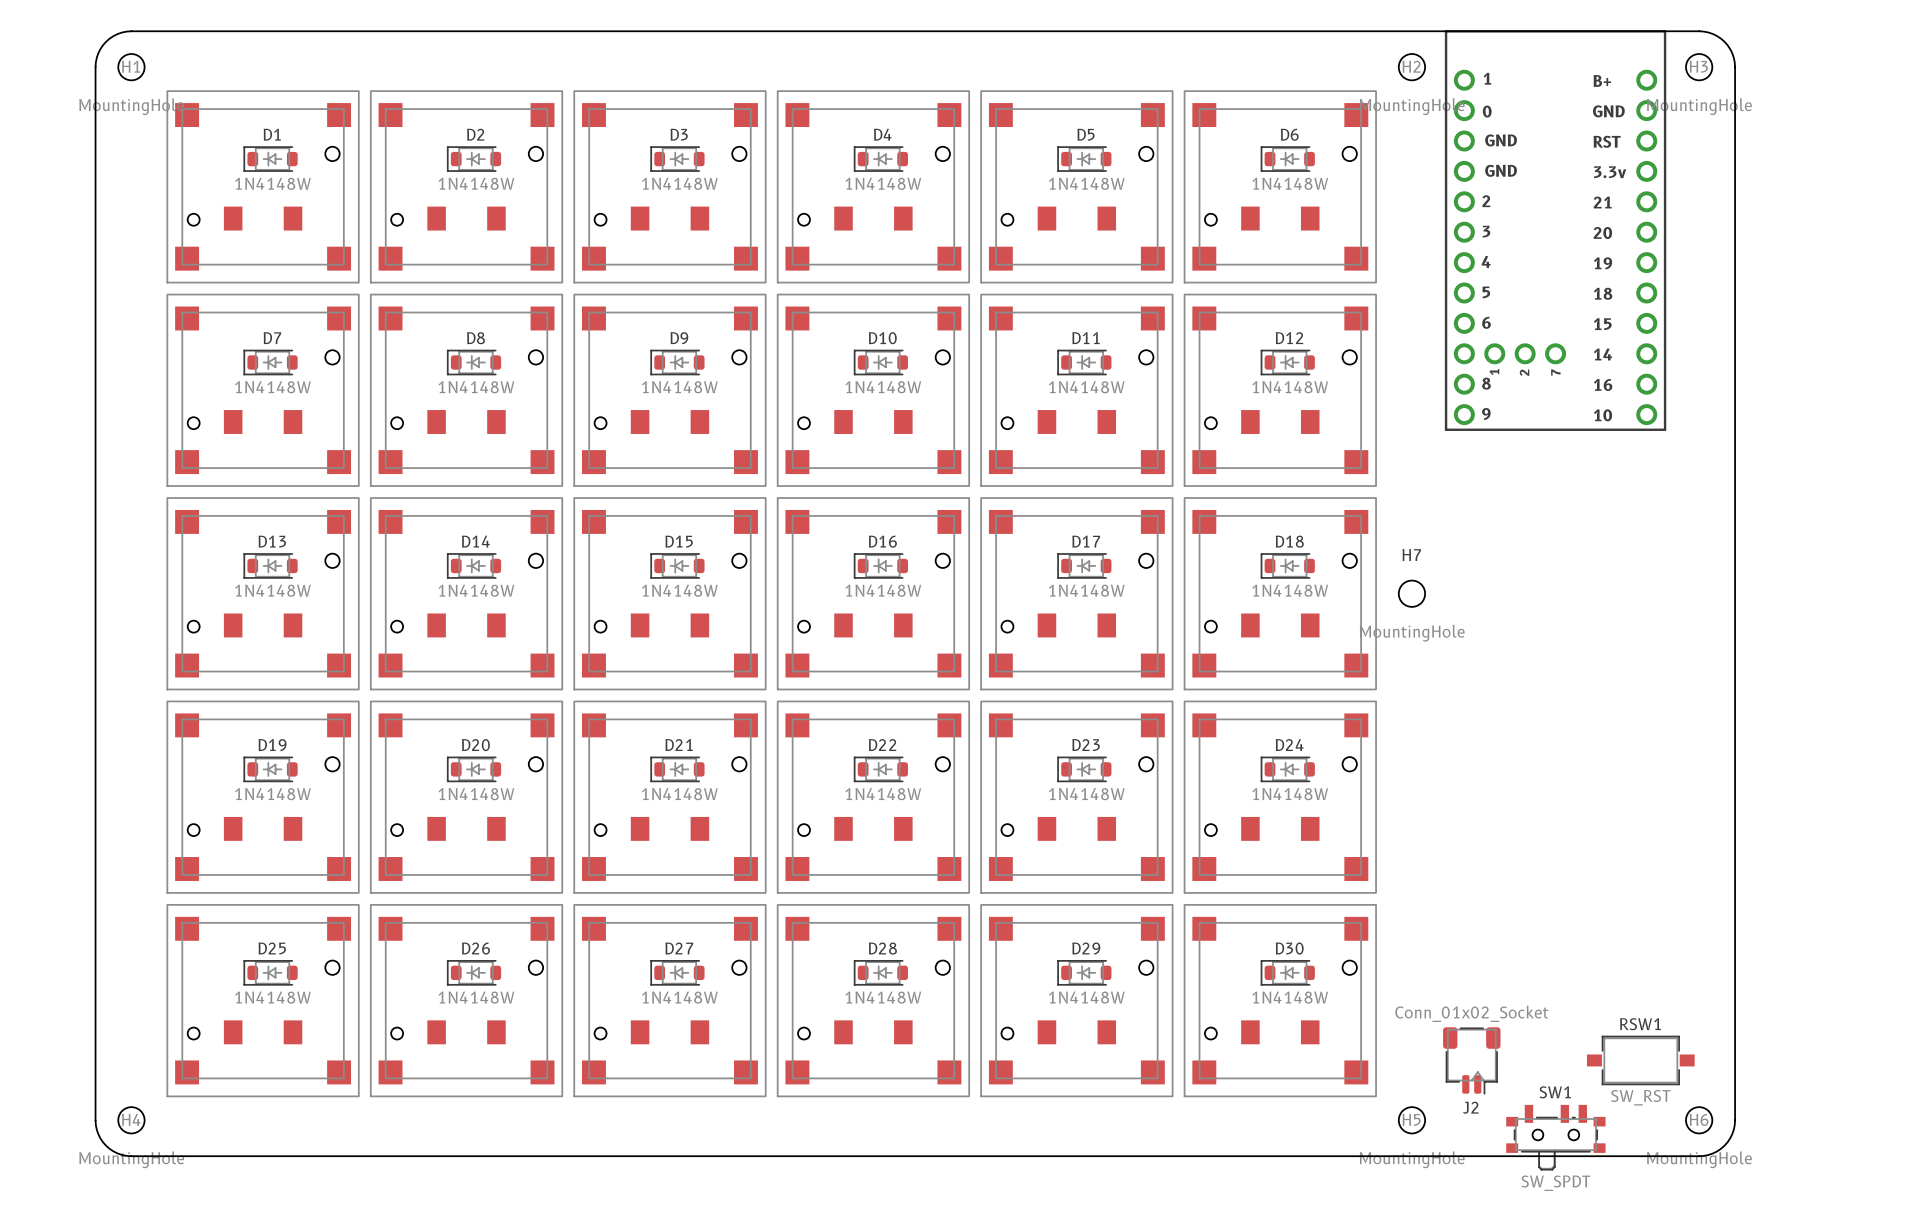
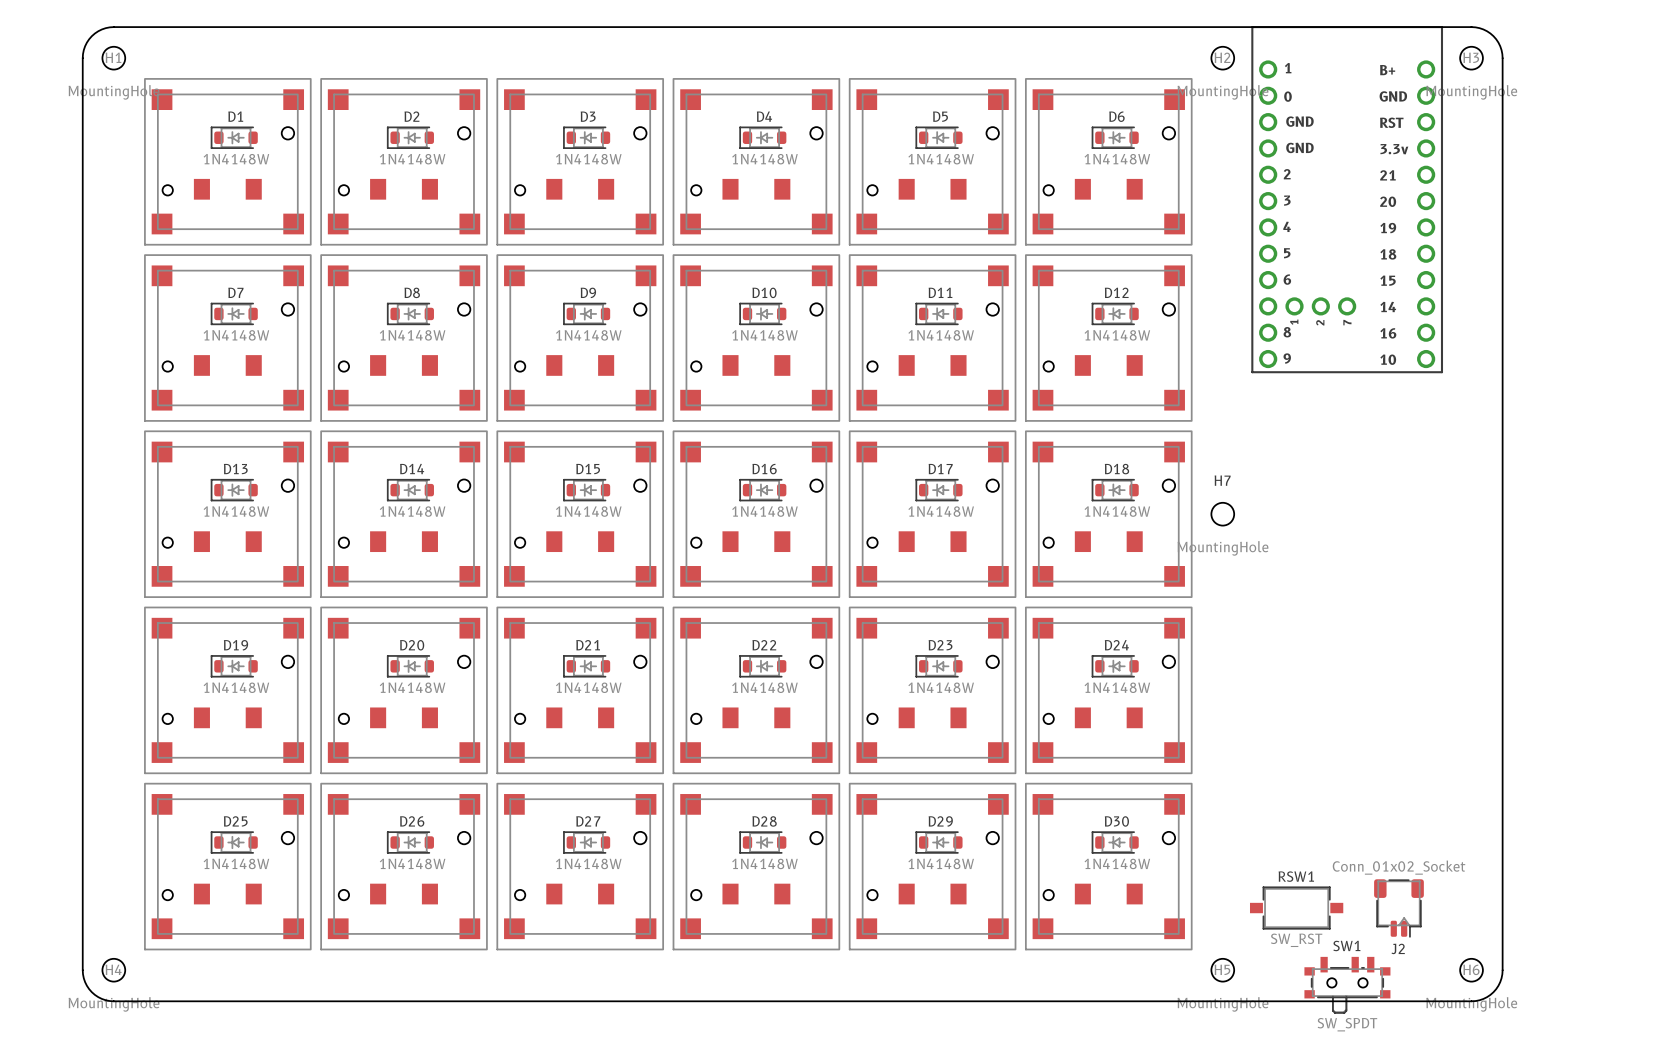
J2 position: (1471, 1060) -> (1398, 908)
RSW1 position: (1640, 1060) -> (1296, 908)

